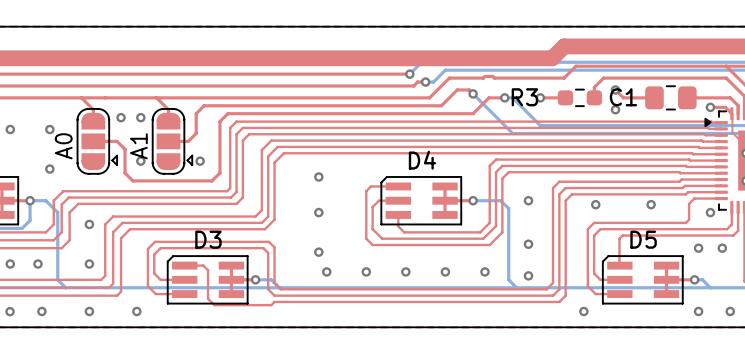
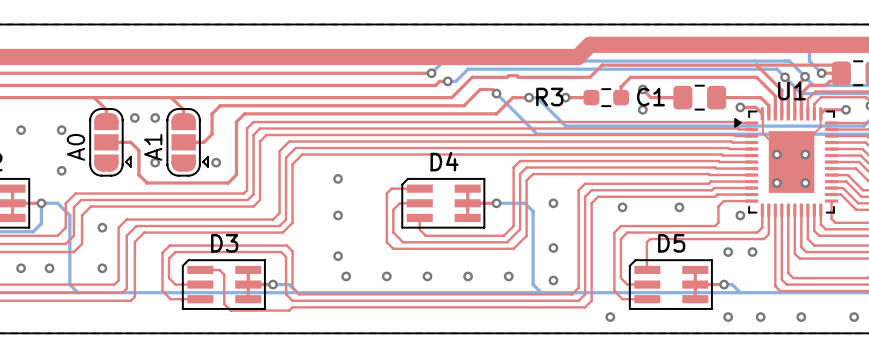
via: (10, 311) -> none
via: (41, 311) -> none
via: (89, 311) -> none
via: (136, 311) -> none

